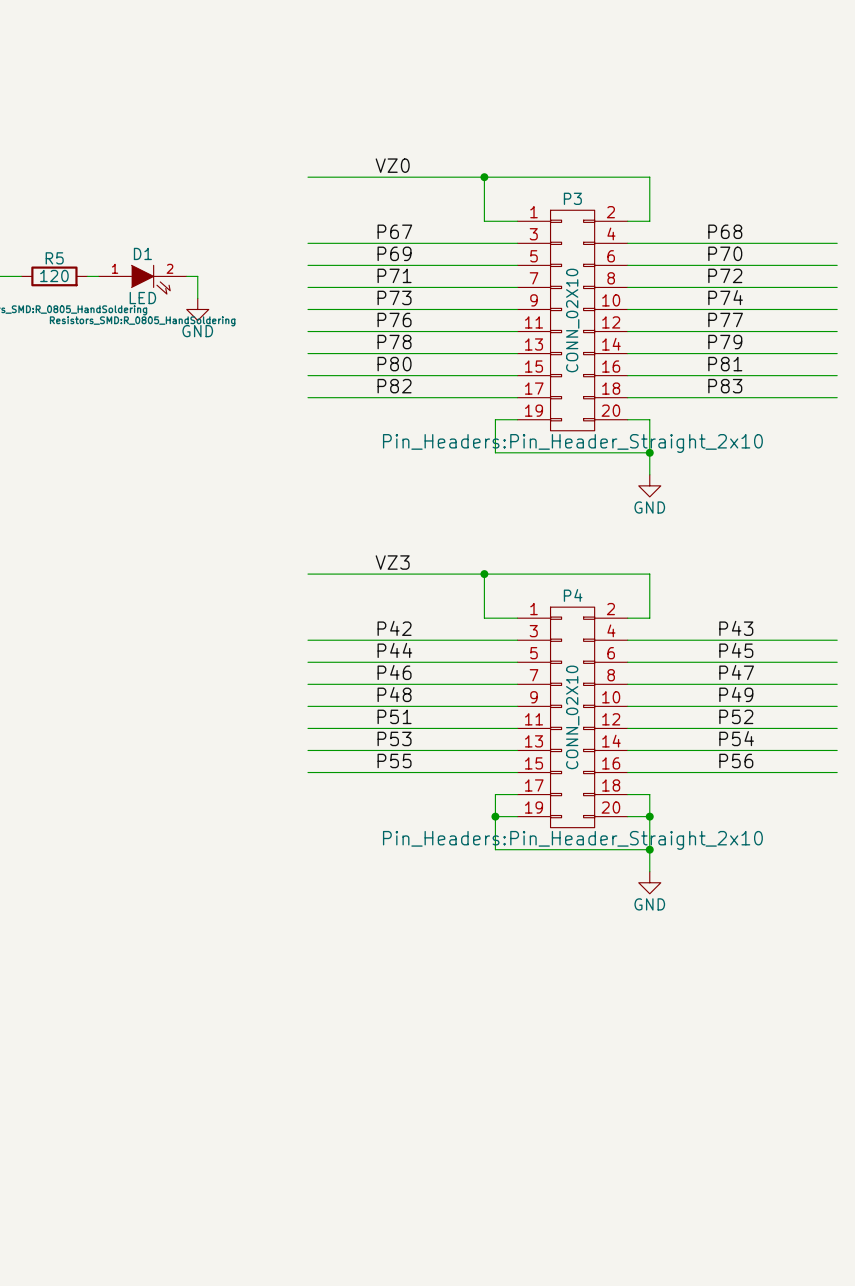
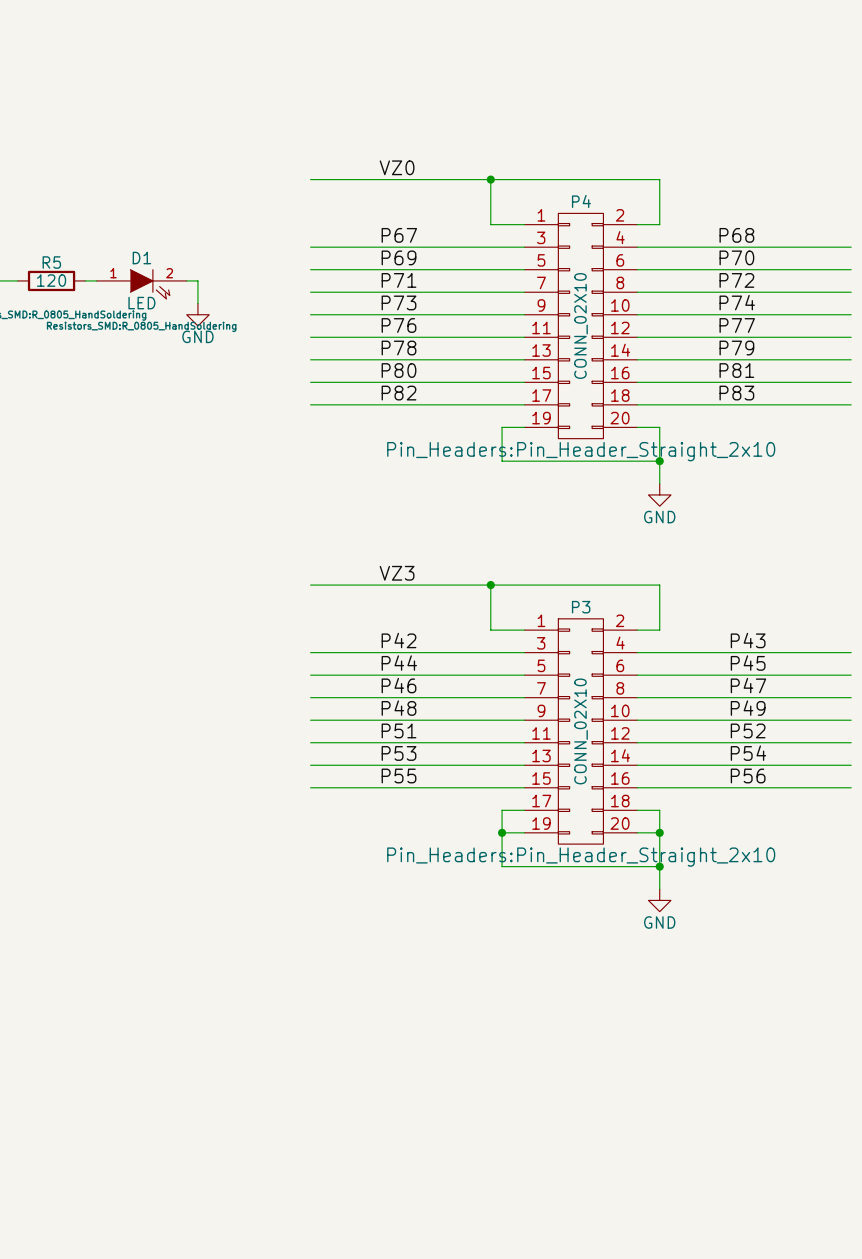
P3 name: P3 (572, 198) -> P4 (581, 201)
P4 name: P4 (573, 595) -> P3 (581, 607)

